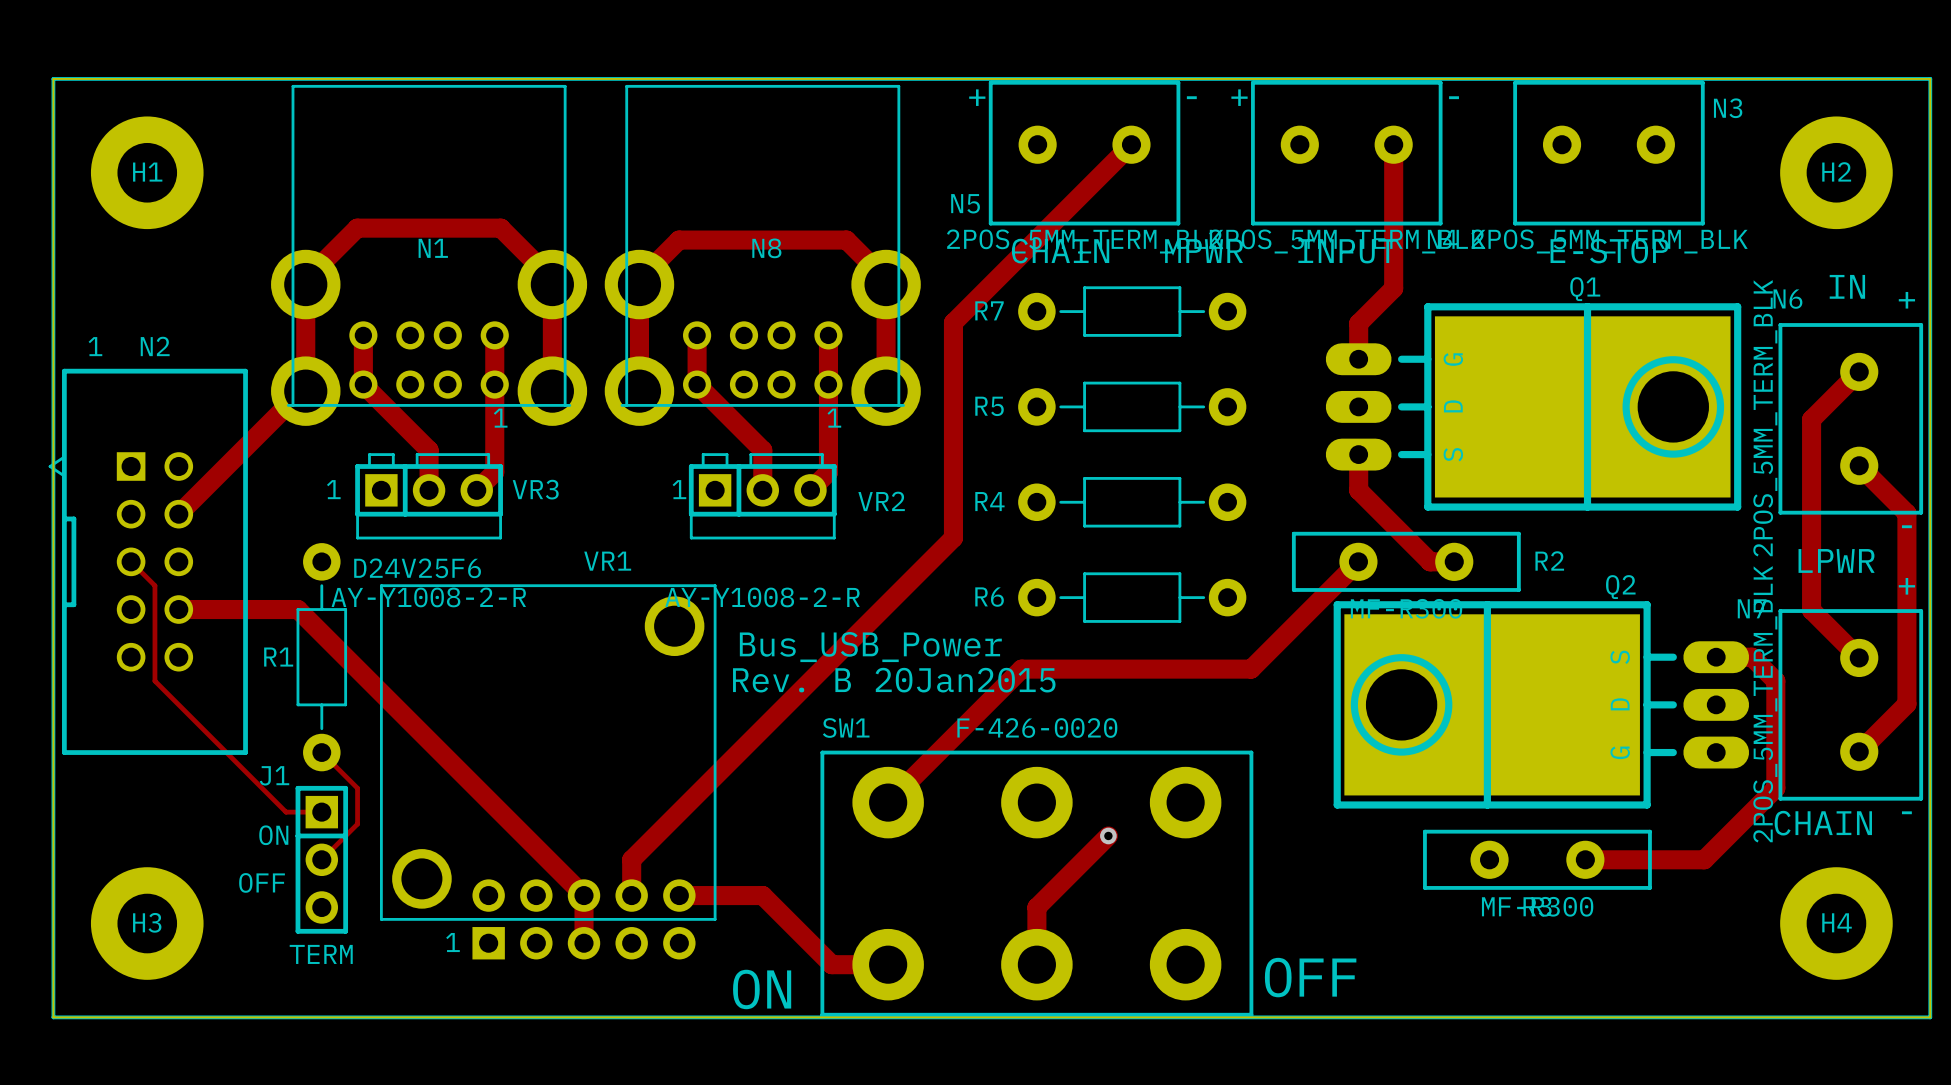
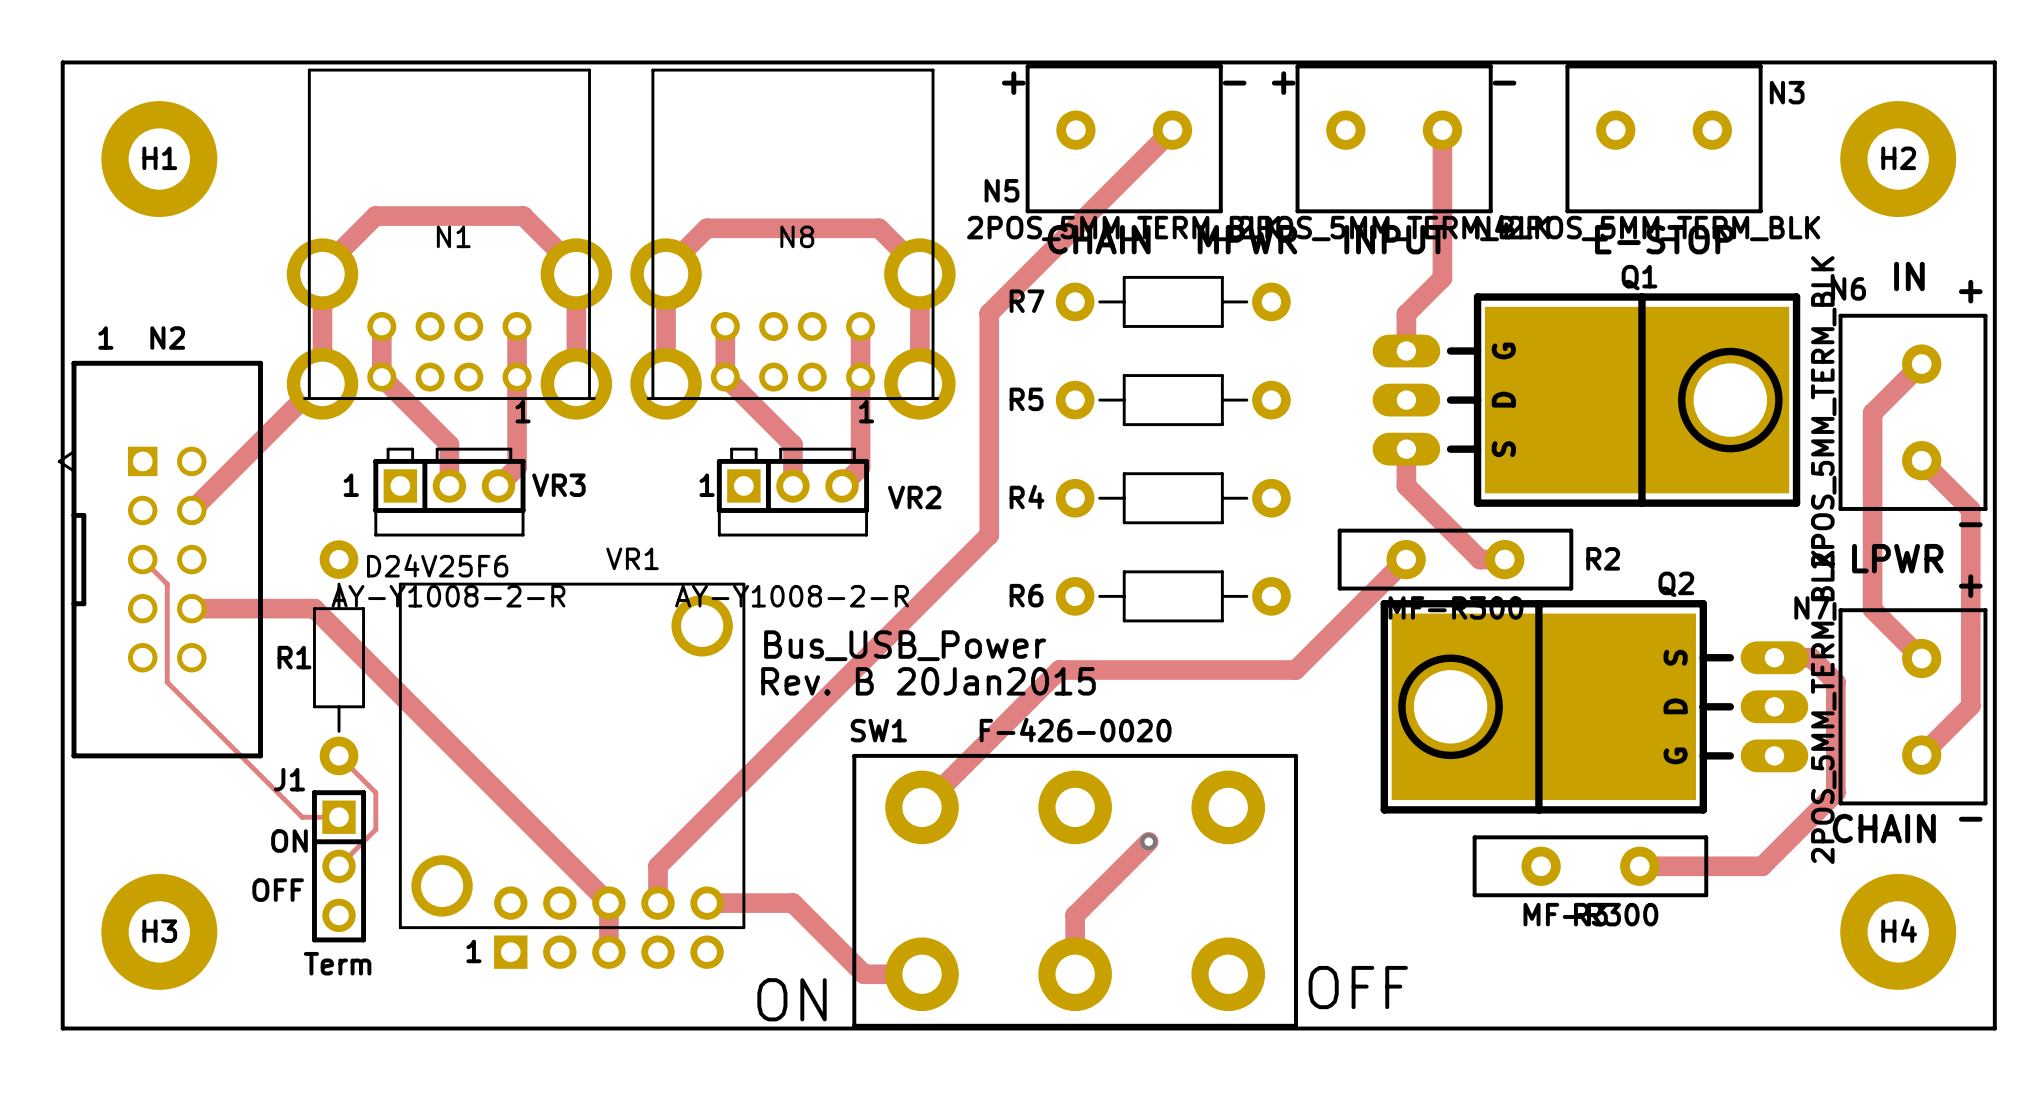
text: TERM (321, 954) -> Term (337, 963)

